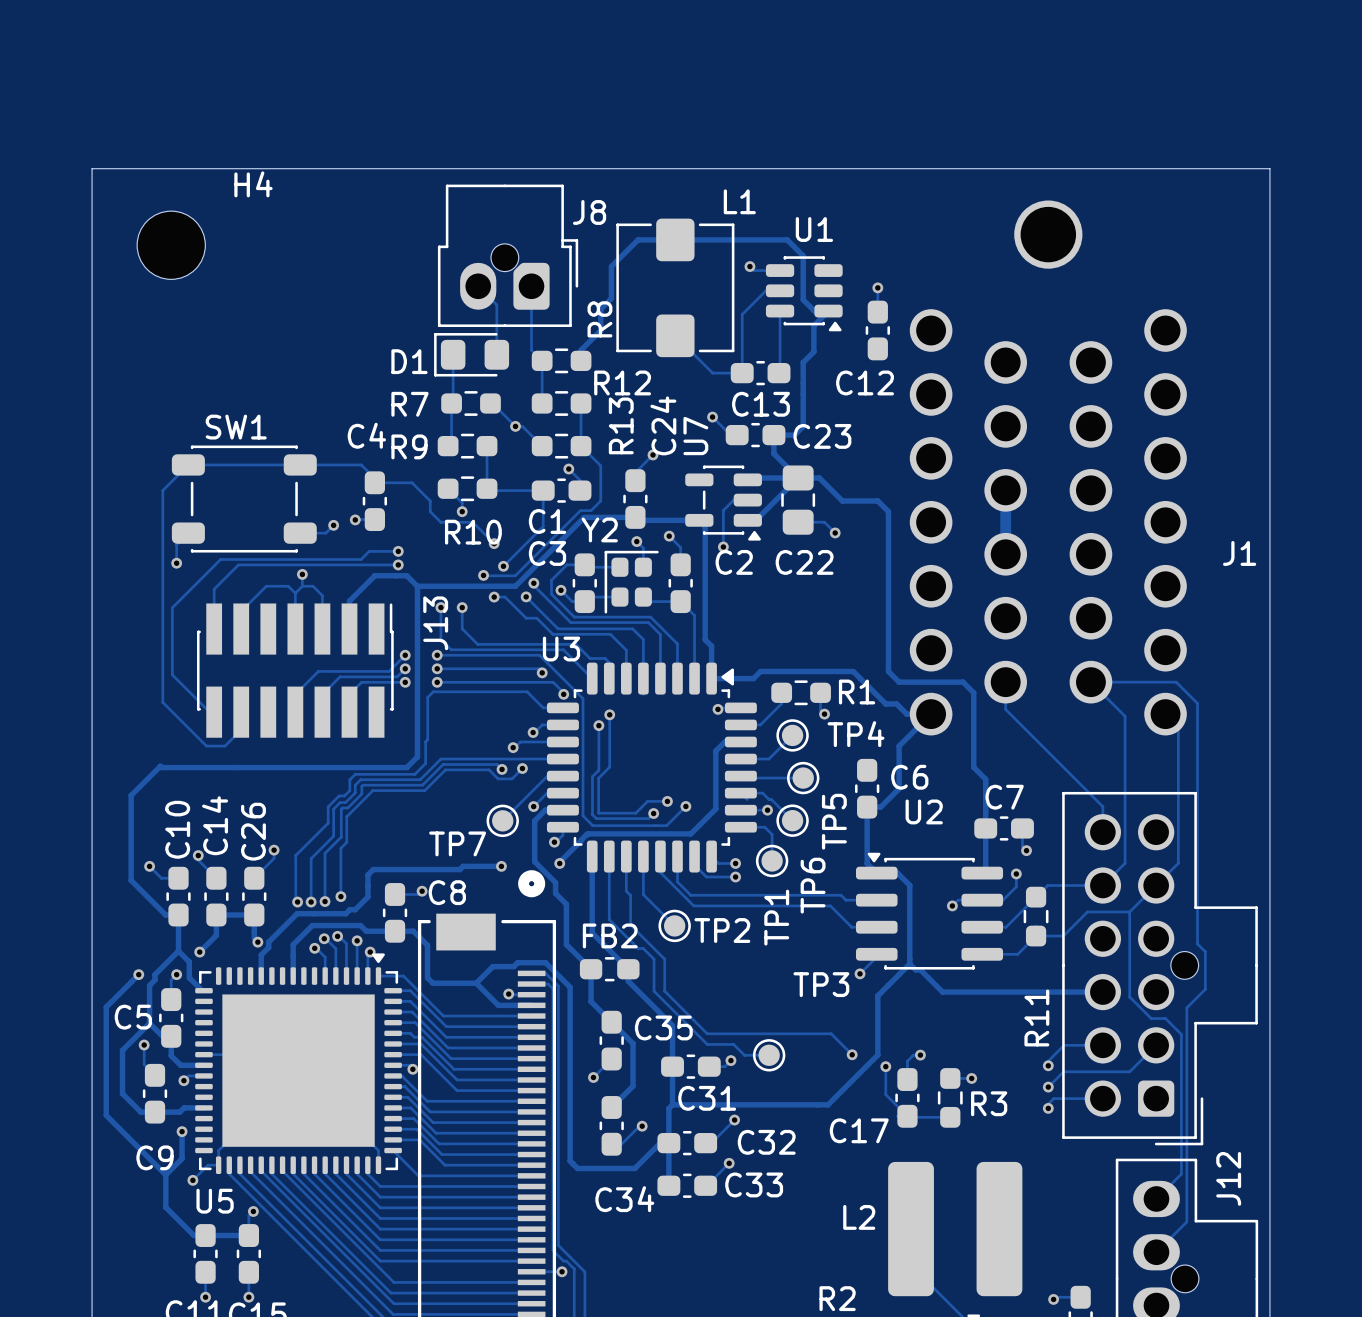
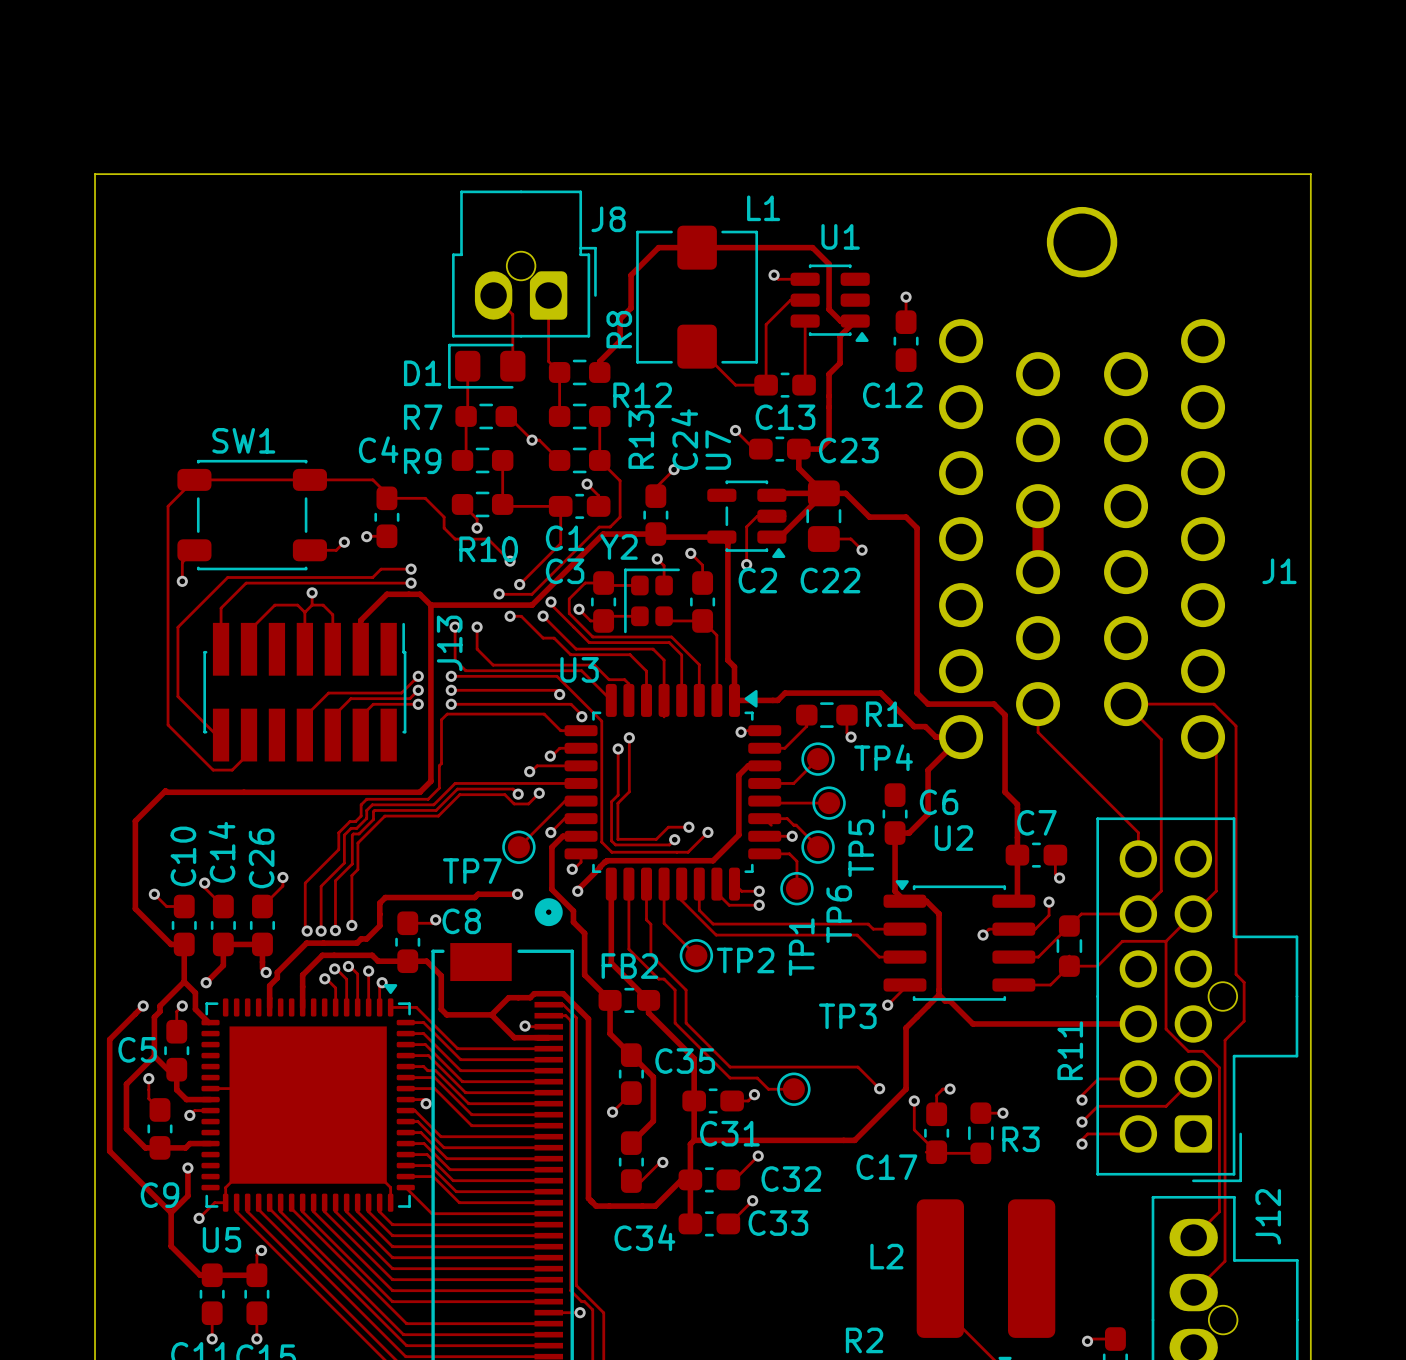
H4: (171, 245) -> none

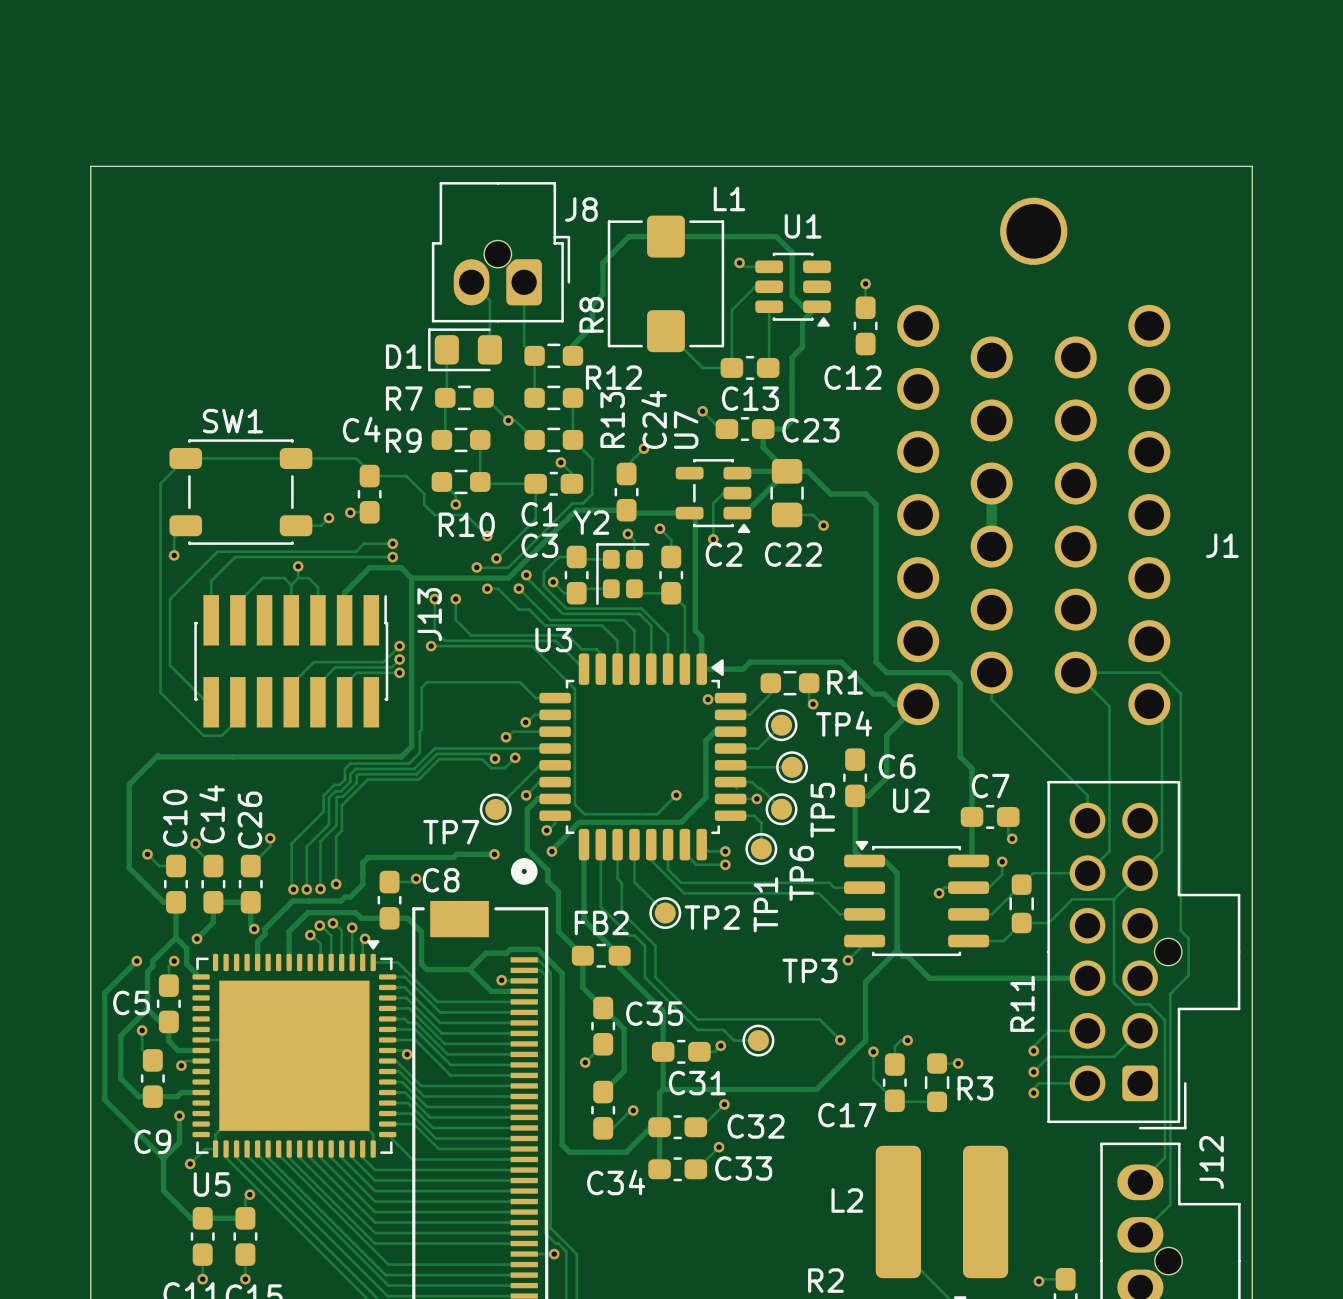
via: (451, 690) -> none
track: (452, 690) (557, 690) (561, 694) -> none
via: (559, 694) -> none
via: (451, 704) -> none
track: (452, 704) (571, 704) (583, 716) -> none
via: (581, 716) -> none
track: (629, 737) (629, 791) (617, 803) (617, 839) (656, 839) (668, 827) (688, 827) -> none
via: (629, 737) -> none
track: (618, 748) (618, 795) (611, 801) (611, 840) (615, 844) (669, 844) (674, 839) -> none
via: (618, 748) -> none
via: (688, 827) -> none
via: (674, 839) -> none

